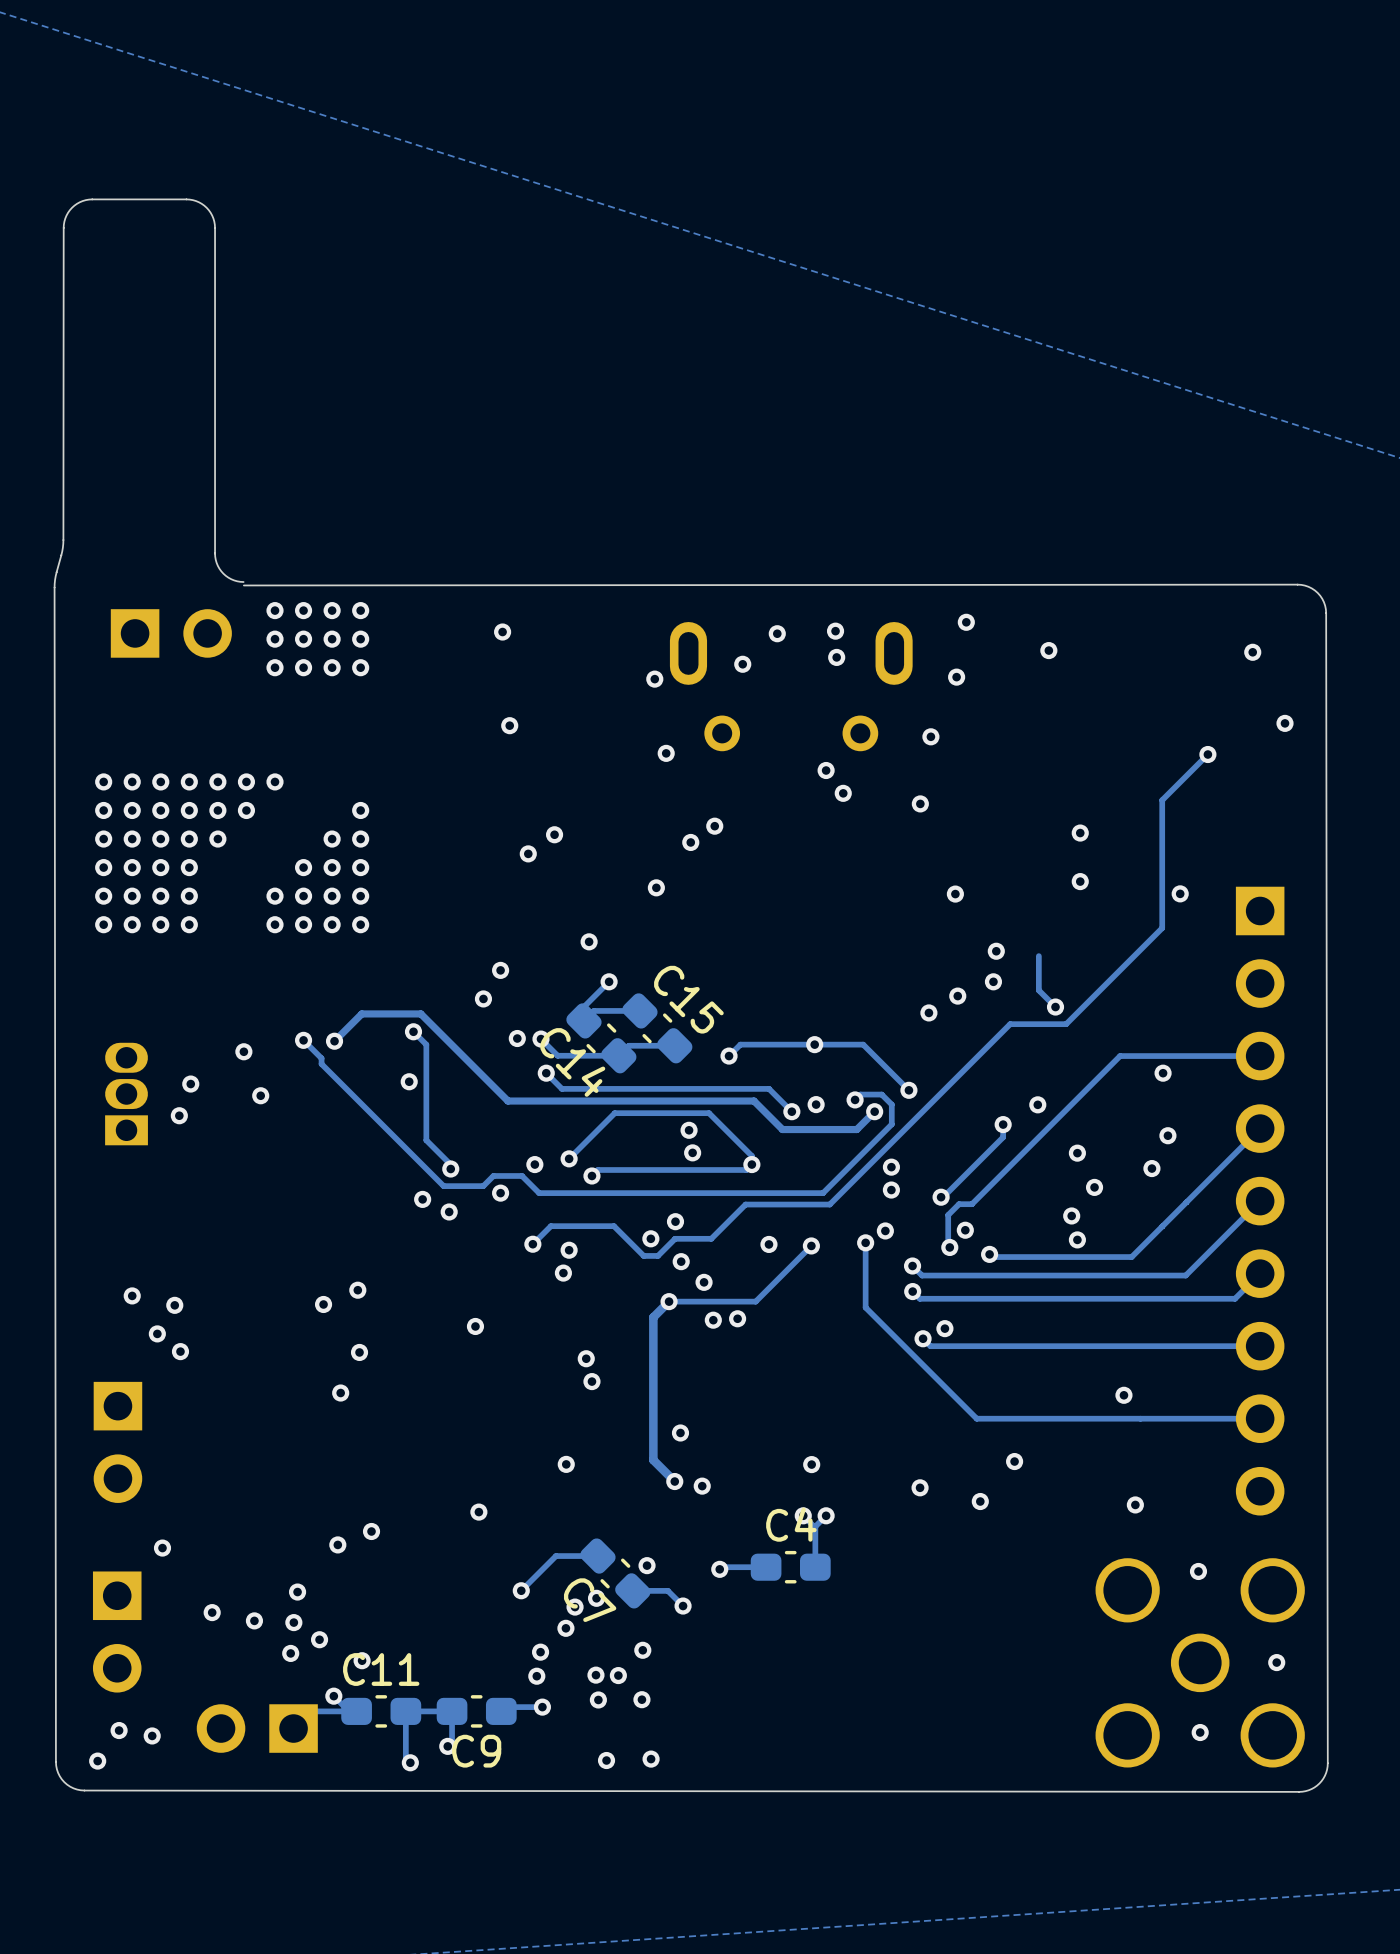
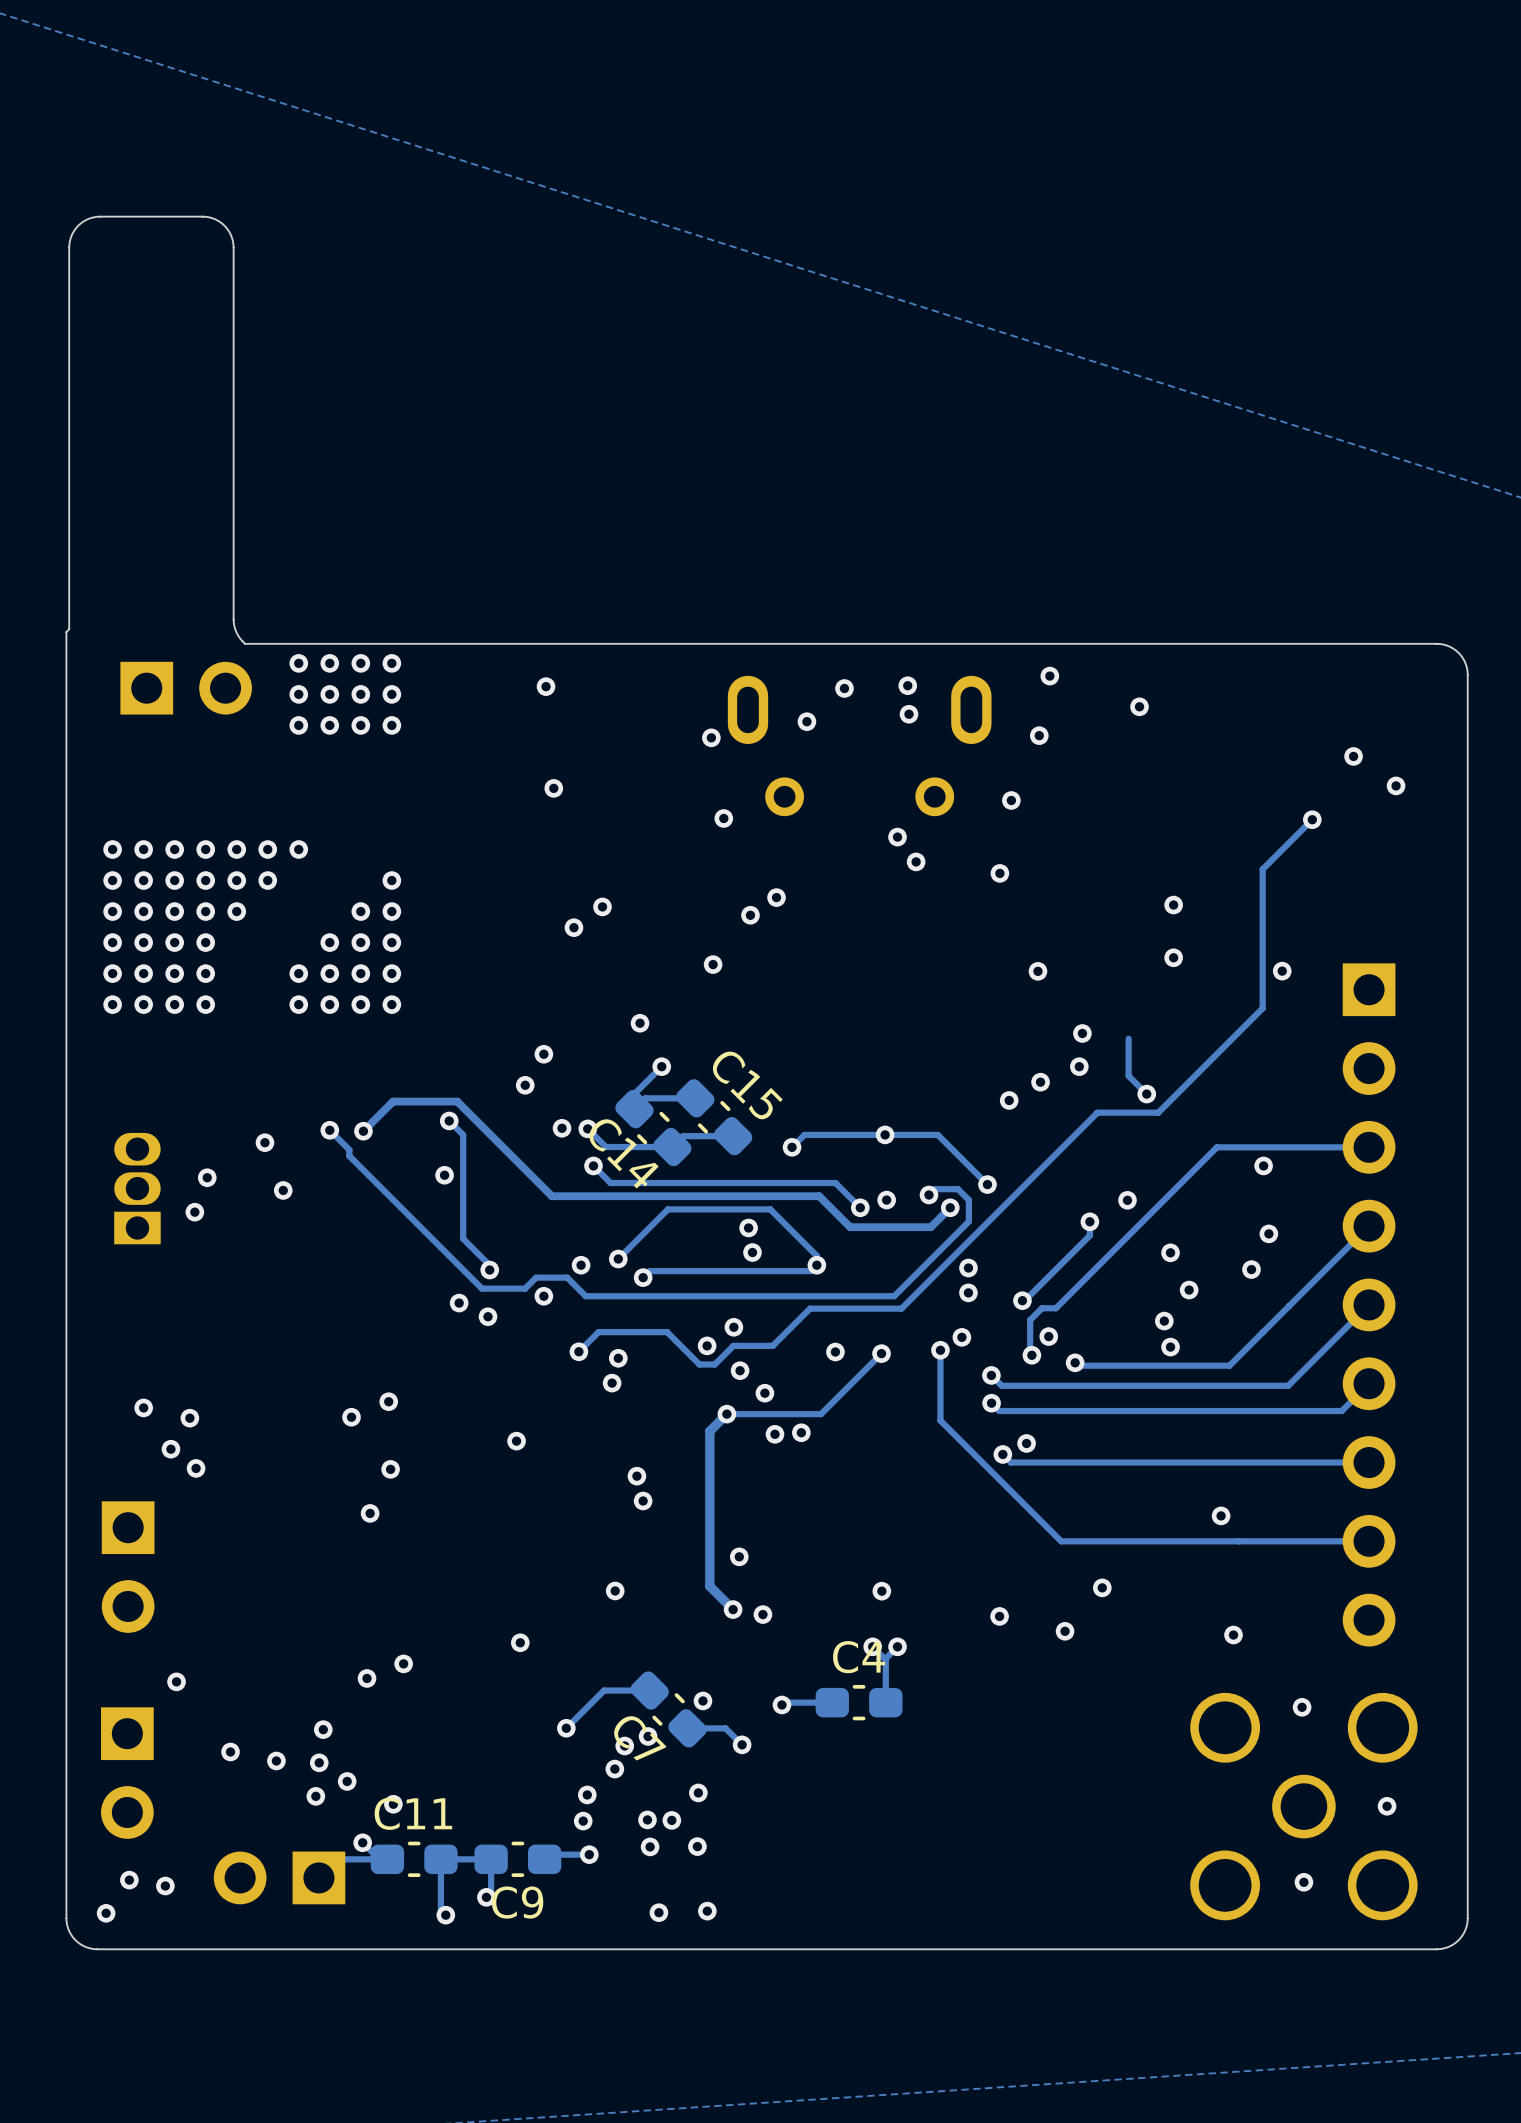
board edge: (63, 227) (63, 540) (54, 587) (55, 1762) (61, 1779) (73, 1788) (84, 1790) (1299, 1791) (1308, 1790) (1319, 1783) (1326, 1772) (1327, 1763) (1326, 613) (1323, 602) (1317, 592) (1308, 586) (1297, 584) (243, 585) -> (69, 247) (69, 629) (66, 632) (66, 1918) (68, 1928) (73, 1937) (83, 1946) (97, 1949) (1436, 1949) (1446, 1947) (1458, 1940) (1464, 1931) (1467, 1918) (1467, 674) (1465, 664) (1458, 652) (1450, 646) (1436, 643) (245, 643) (234, 628) (233, 601)
board edge: (215, 553) (217, 565) (223, 573) (234, 580) (243, 582) -> none
via position: (1252, 652) -> (1353, 756)

